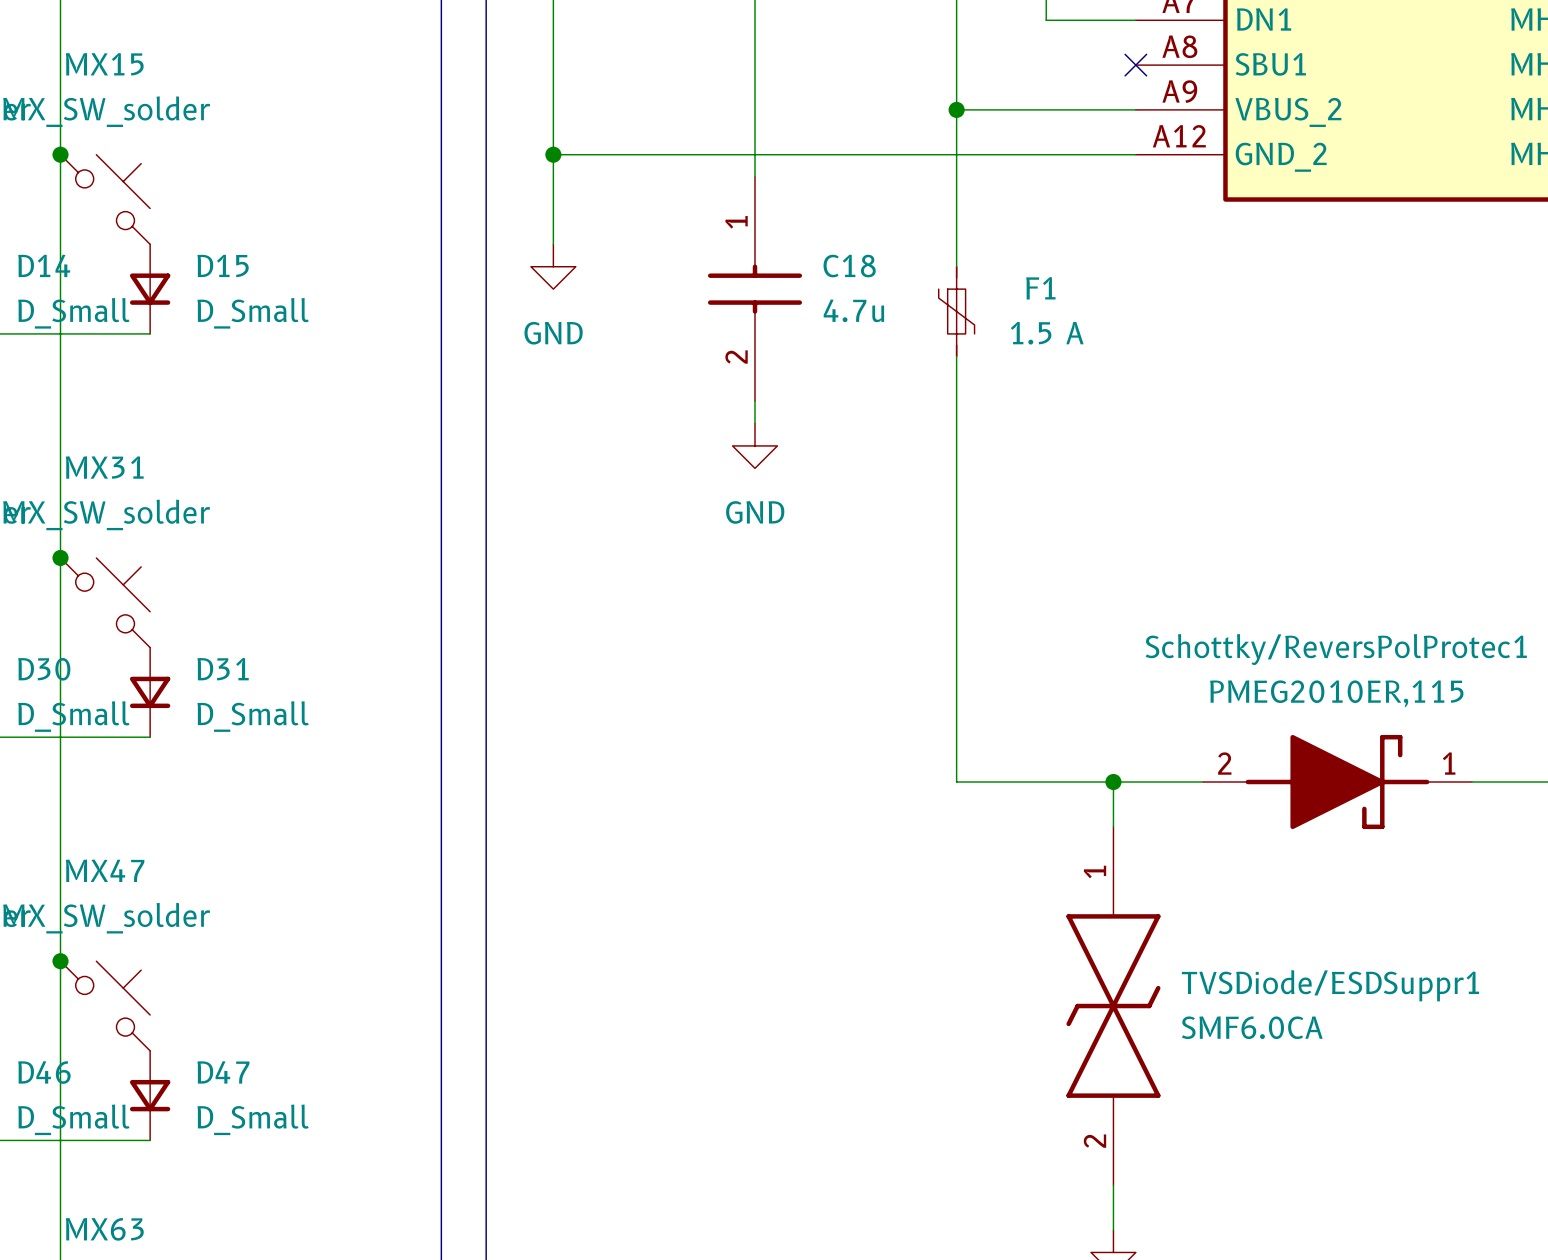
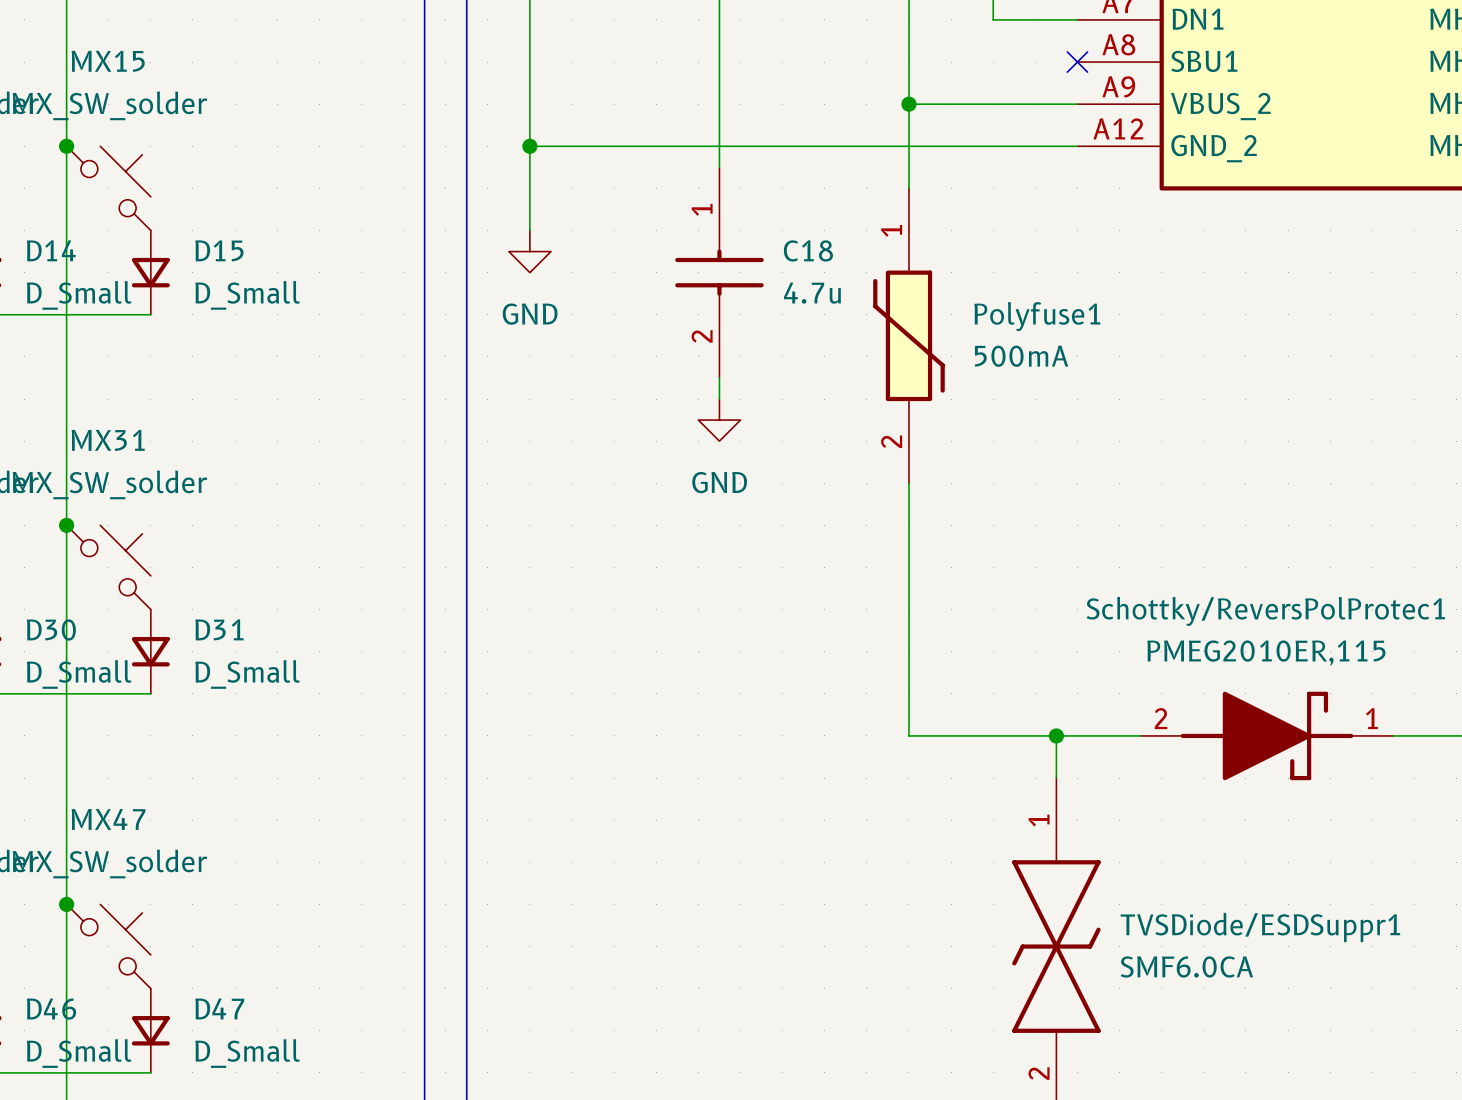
F1: (956, 311) -> none
Polyfuse1: none -> 500mA (908, 335)

